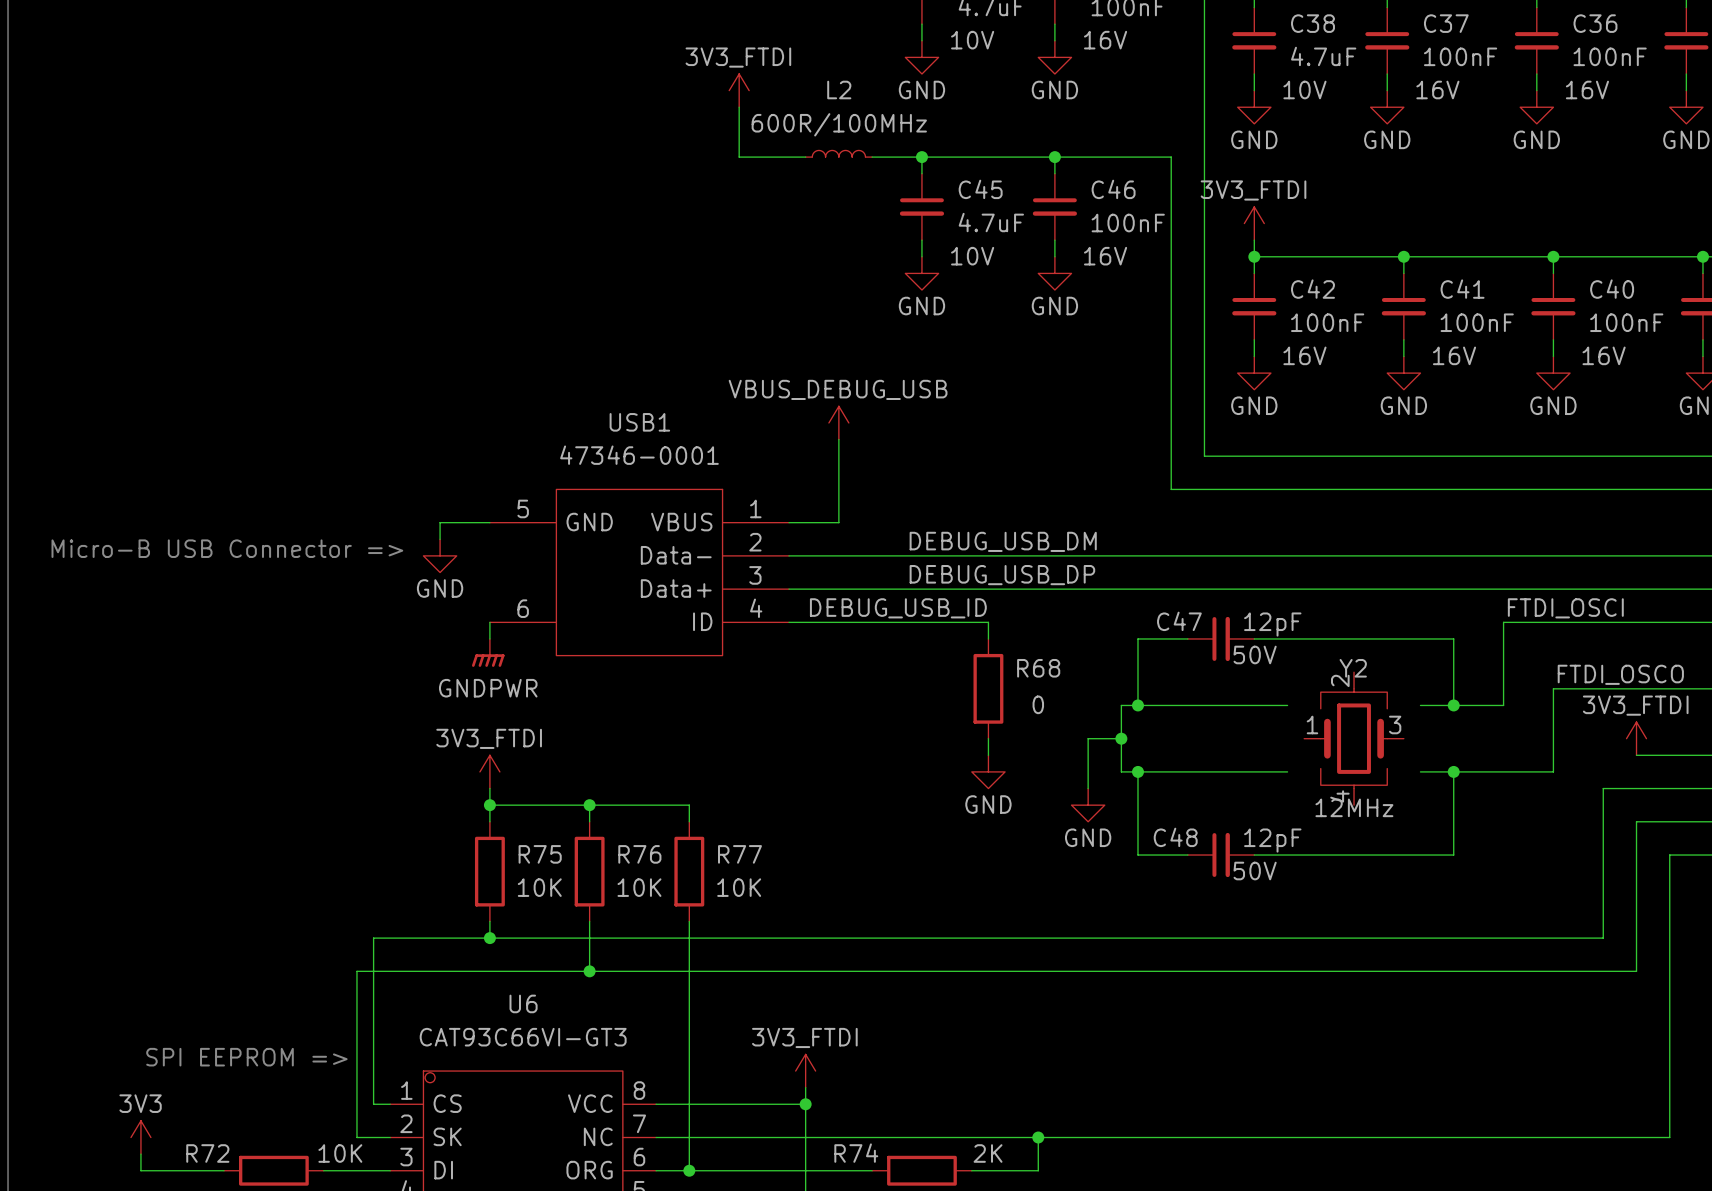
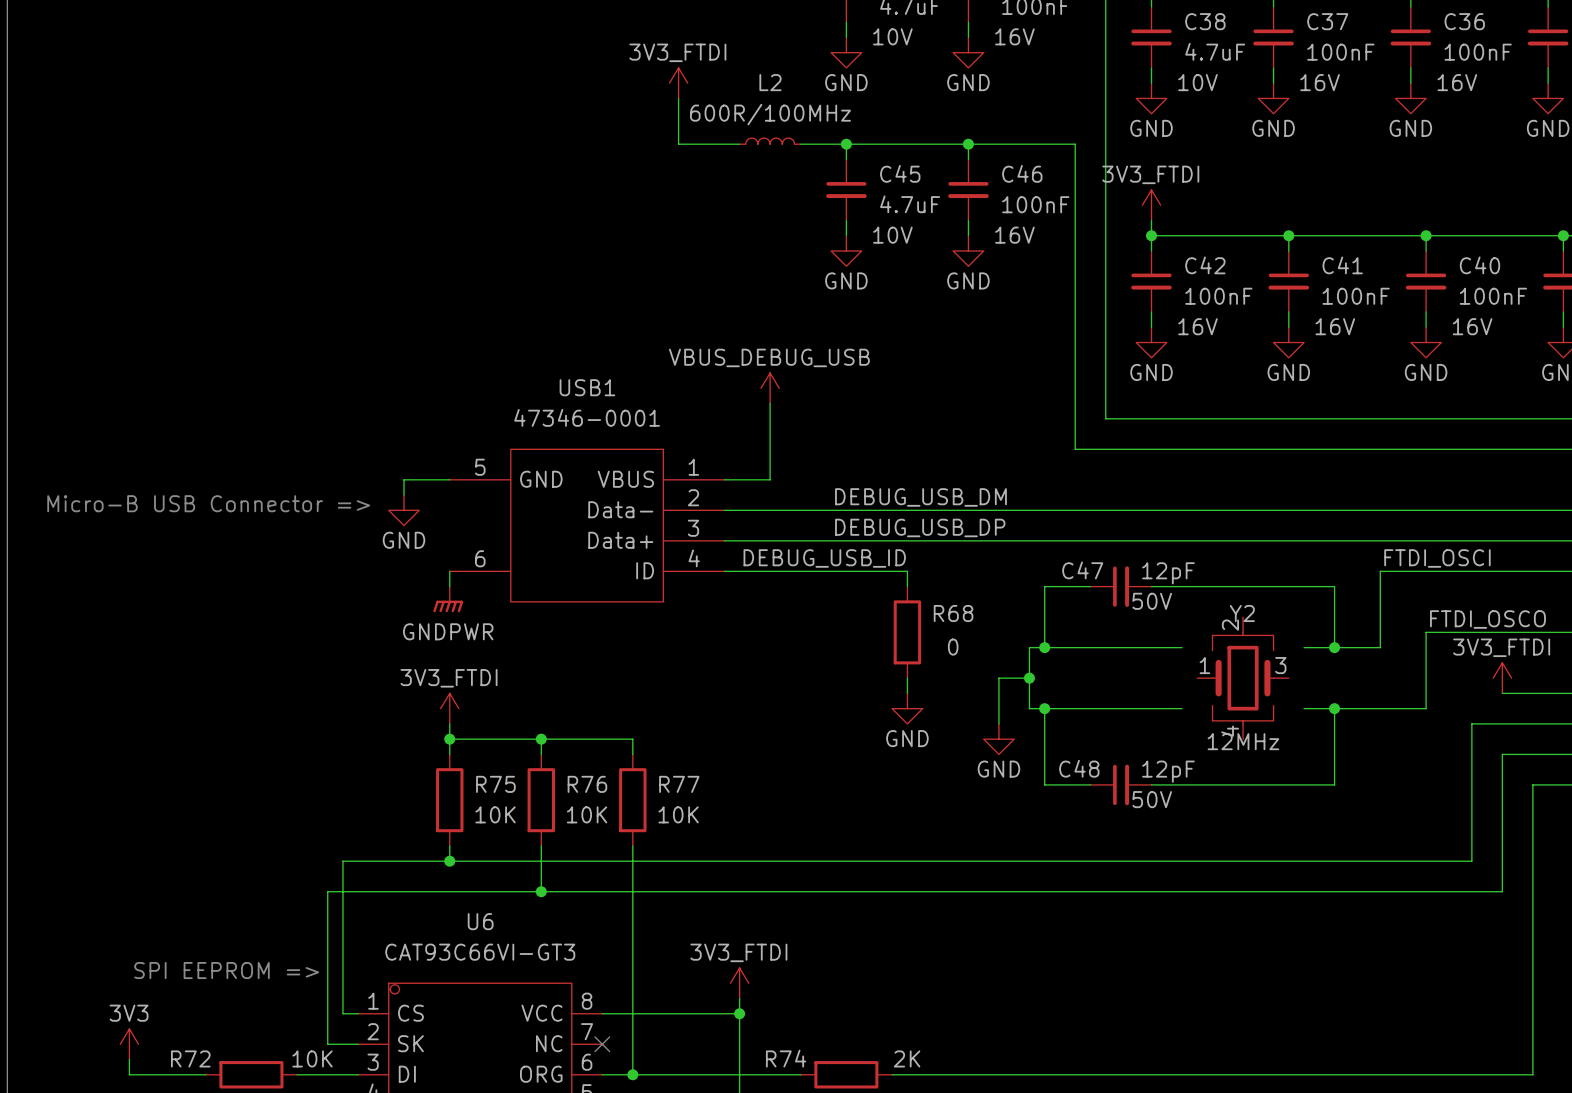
wire: (656, 1137) (1669, 1137) -> (953, 1074) (1532, 1074) (1532, 1044)
no-connect mark: none -> (602, 1044)
wire: (1038, 1137) (1038, 1170) -> none
junction: (1038, 1137) -> none

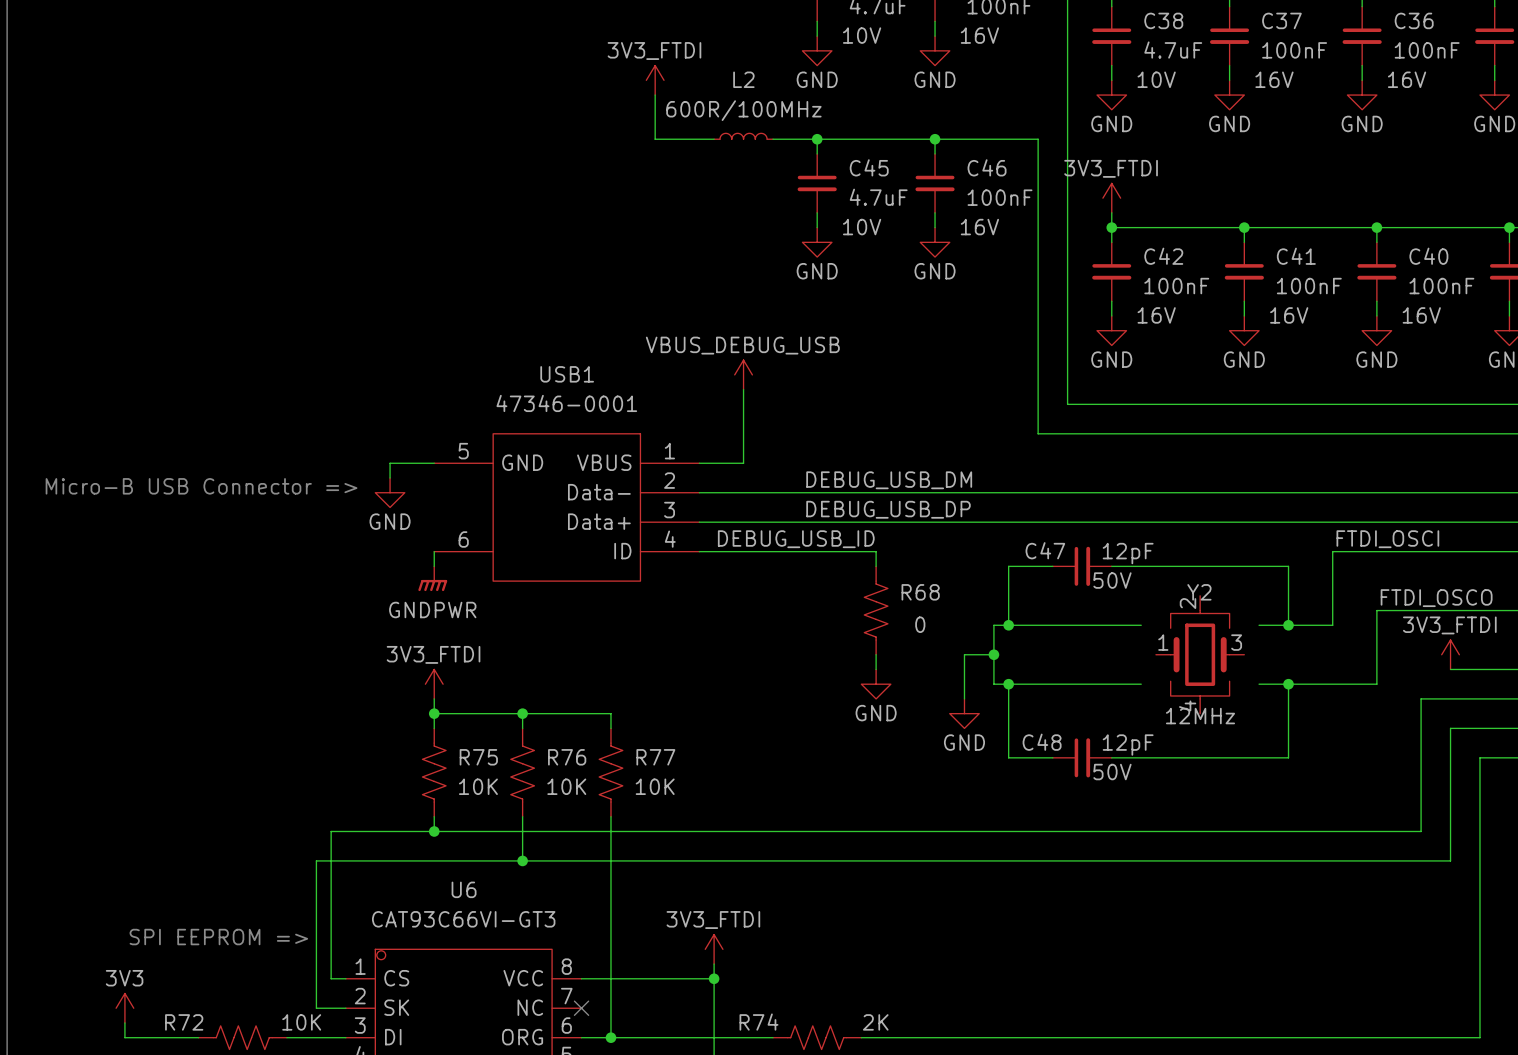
R68 symbol: [893, 586, 922, 679] -> [864, 566, 888, 655]
R75 symbol: [436, 754, 464, 846] -> [422, 728, 447, 817]
R76 symbol: [527, 754, 556, 846] -> [510, 728, 535, 817]
R77 symbol: [619, 754, 647, 846] -> [599, 728, 623, 817]
R72 symbol: [205, 1061, 298, 1089] -> [198, 1025, 287, 1050]
R74 symbol: [800, 1061, 893, 1089] -> [773, 1025, 862, 1050]

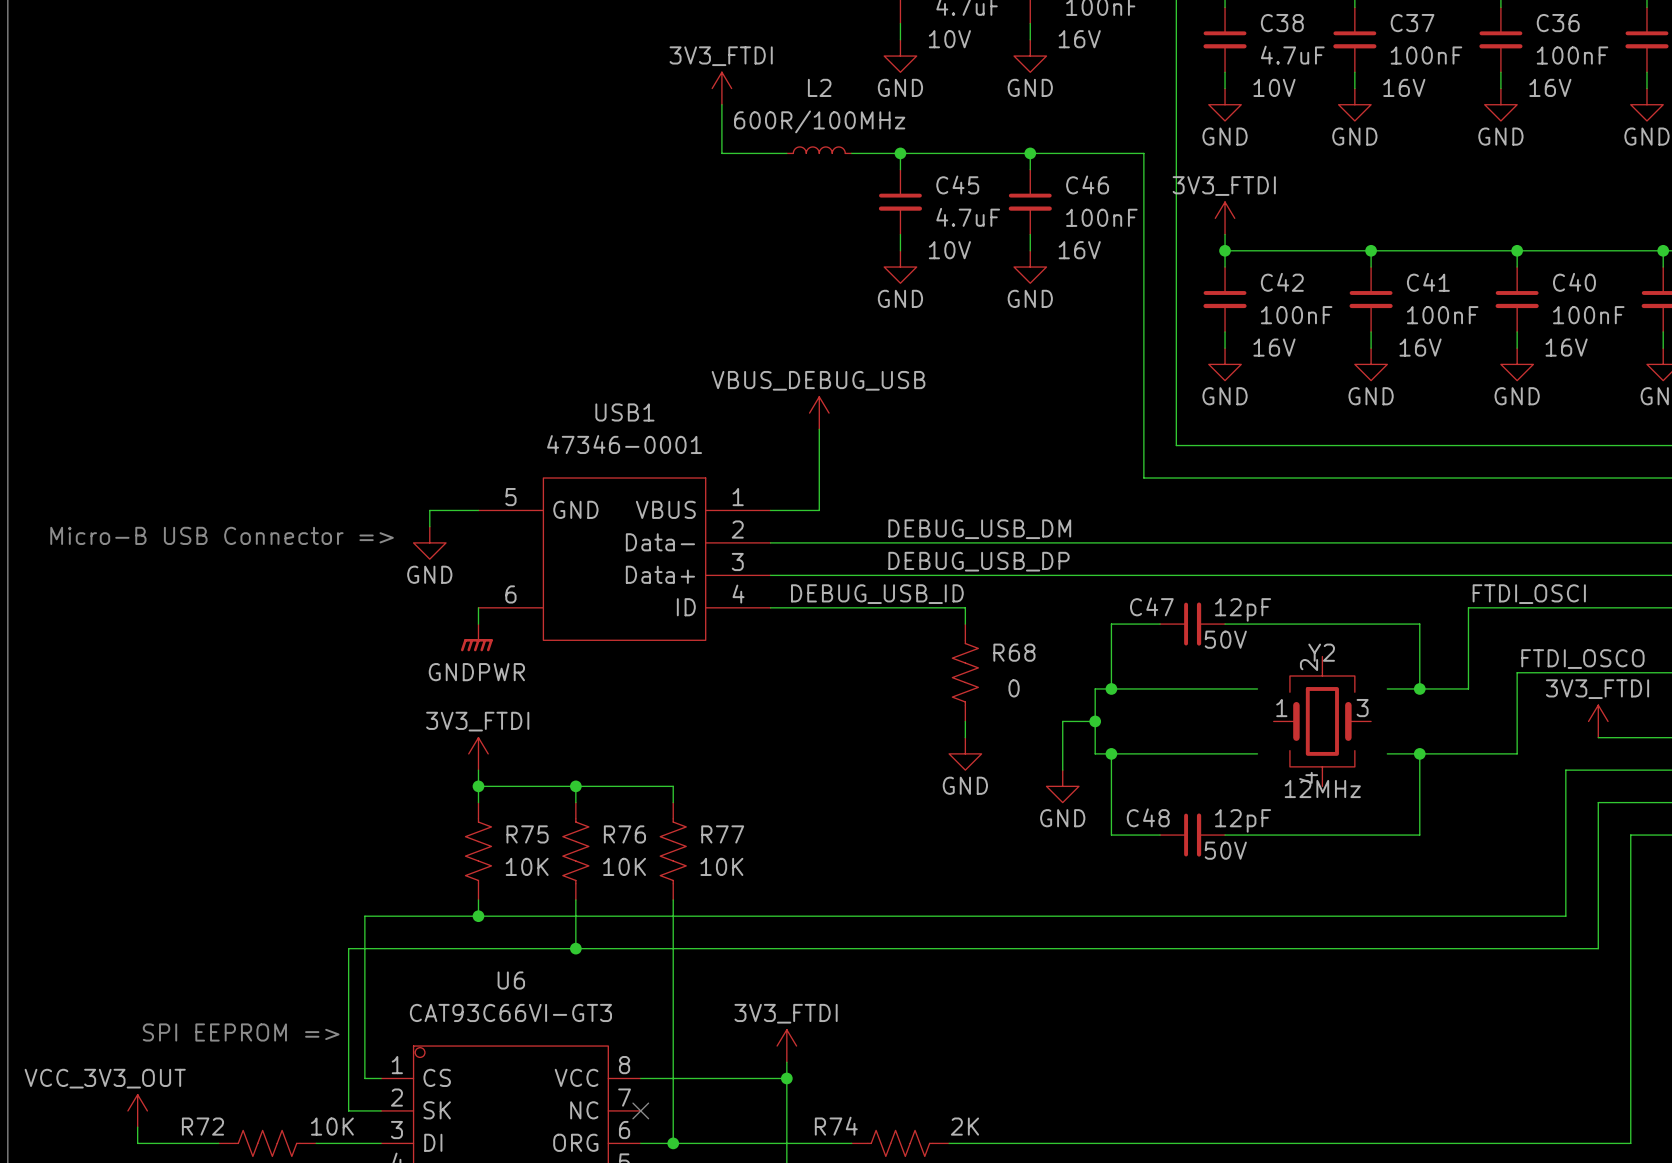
power symbol: 3V3 (124, 1008) -> VCC_3V3_OUT (137, 1110)

